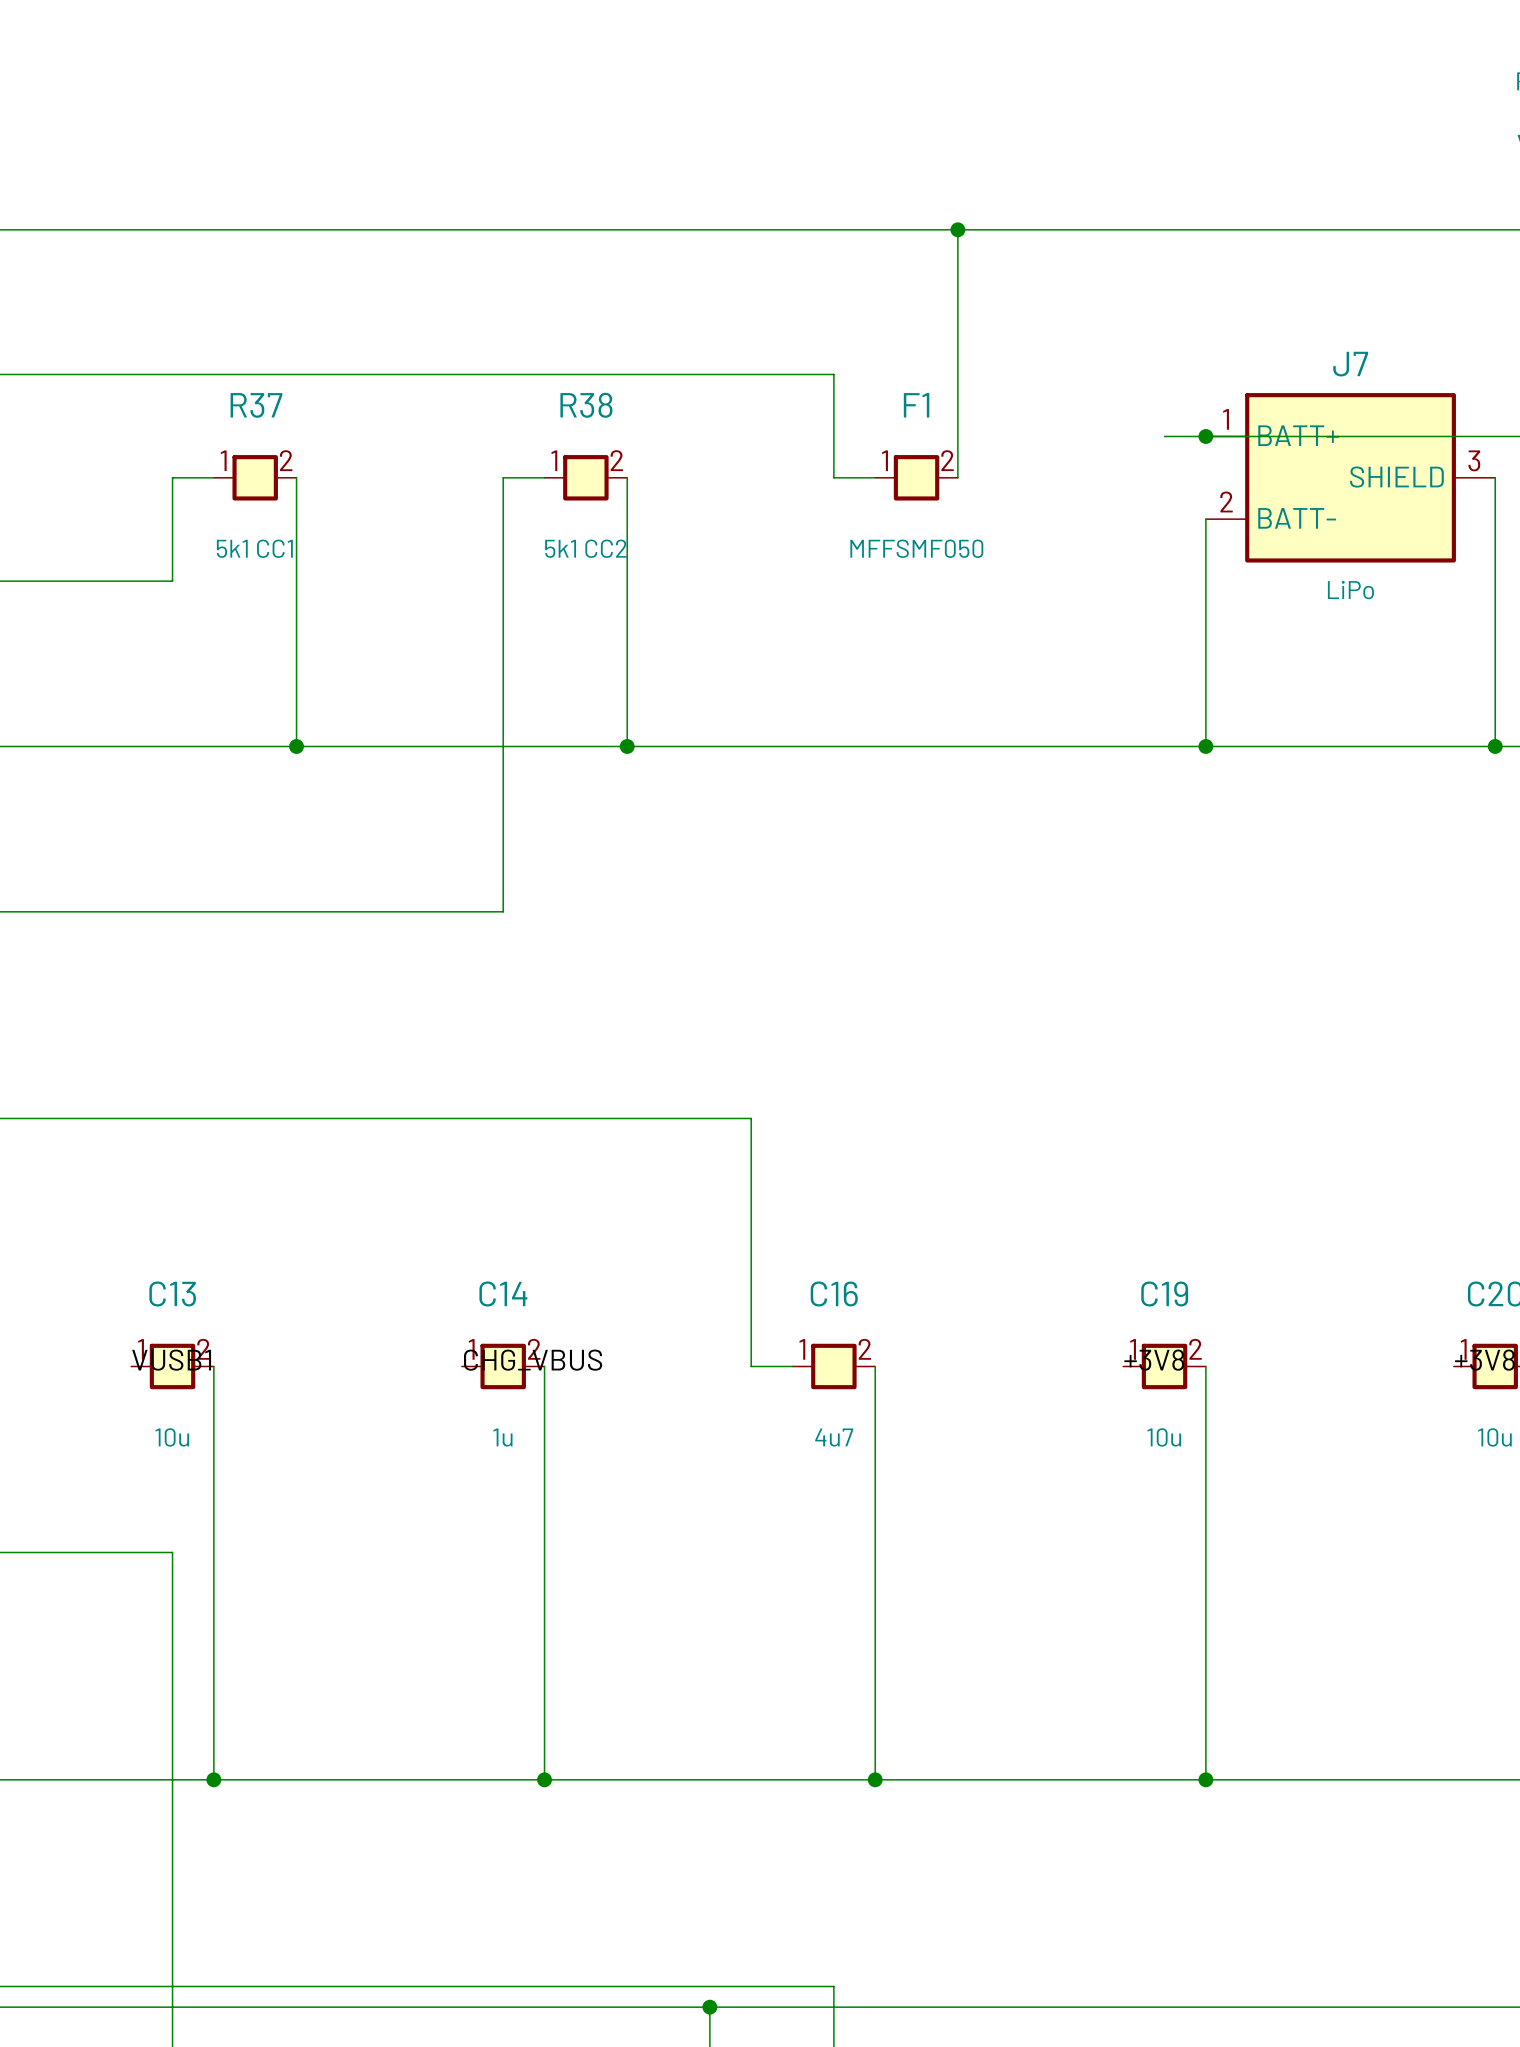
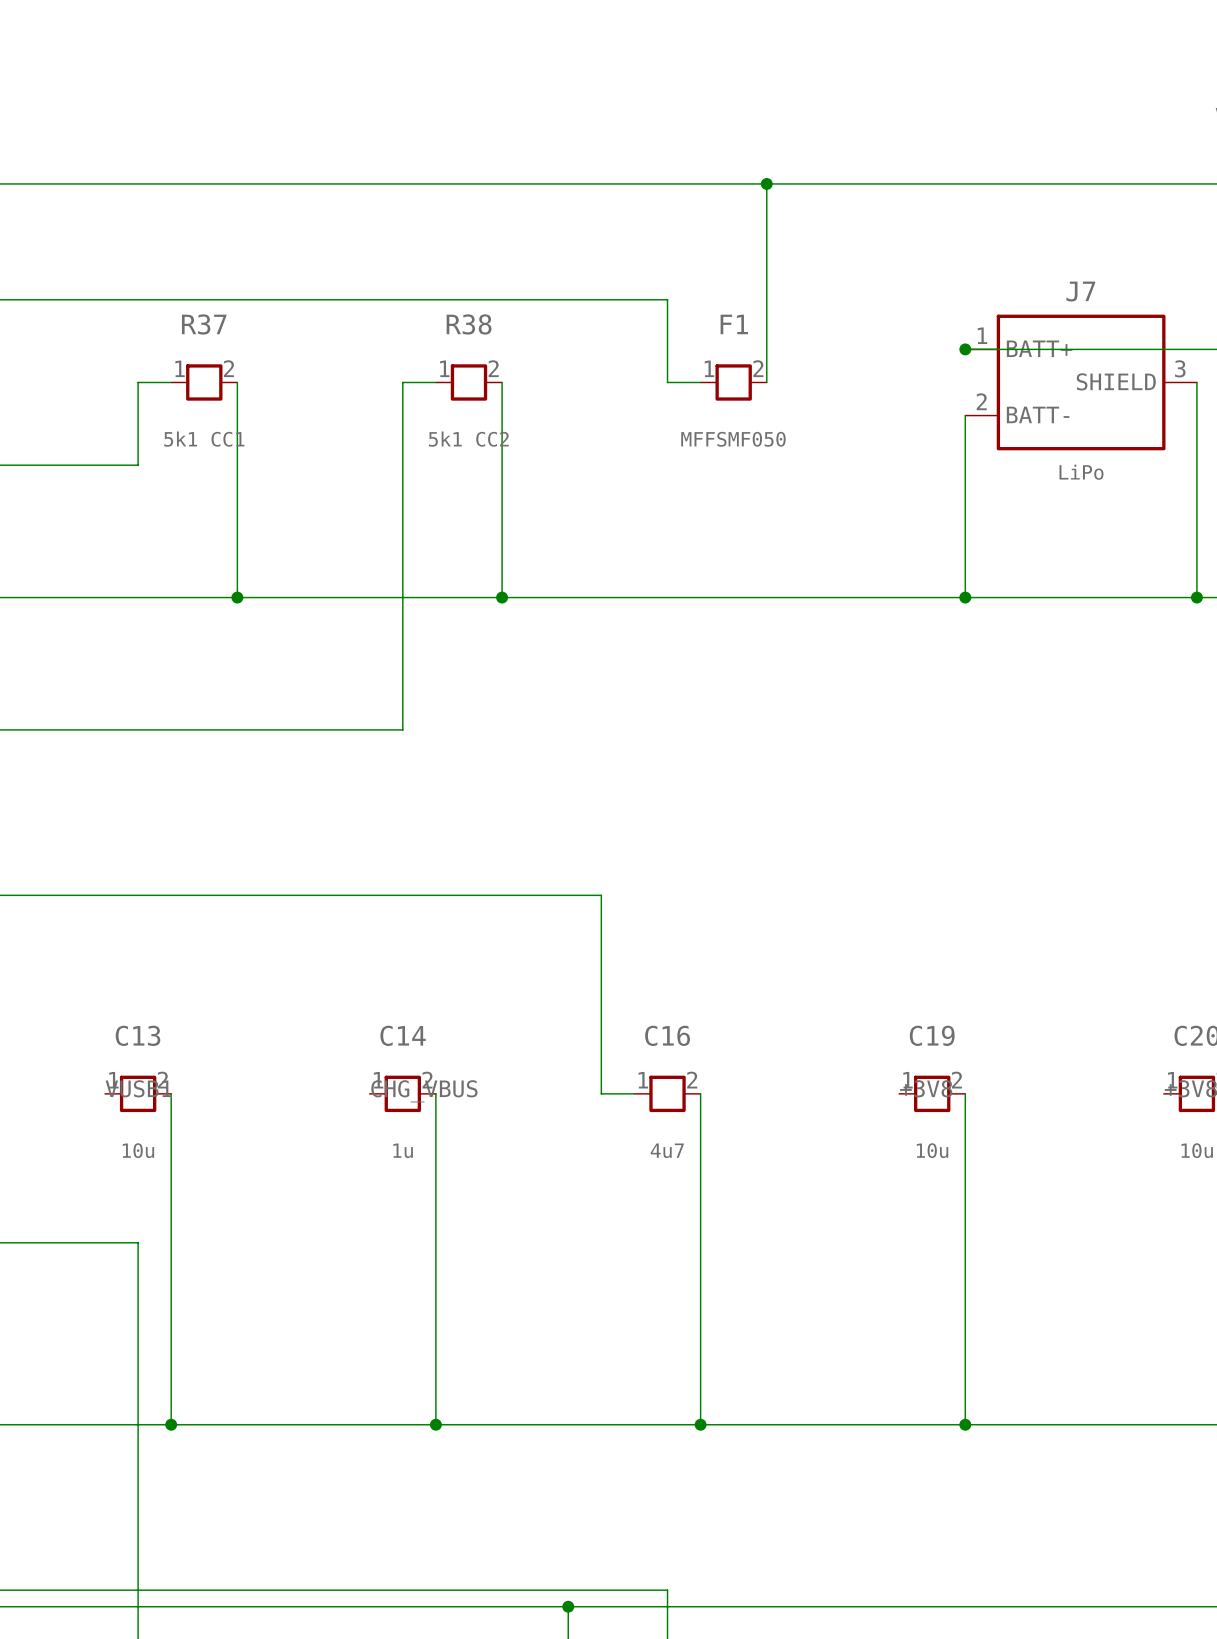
wire: (1164, 436) (1205, 436) -> none

